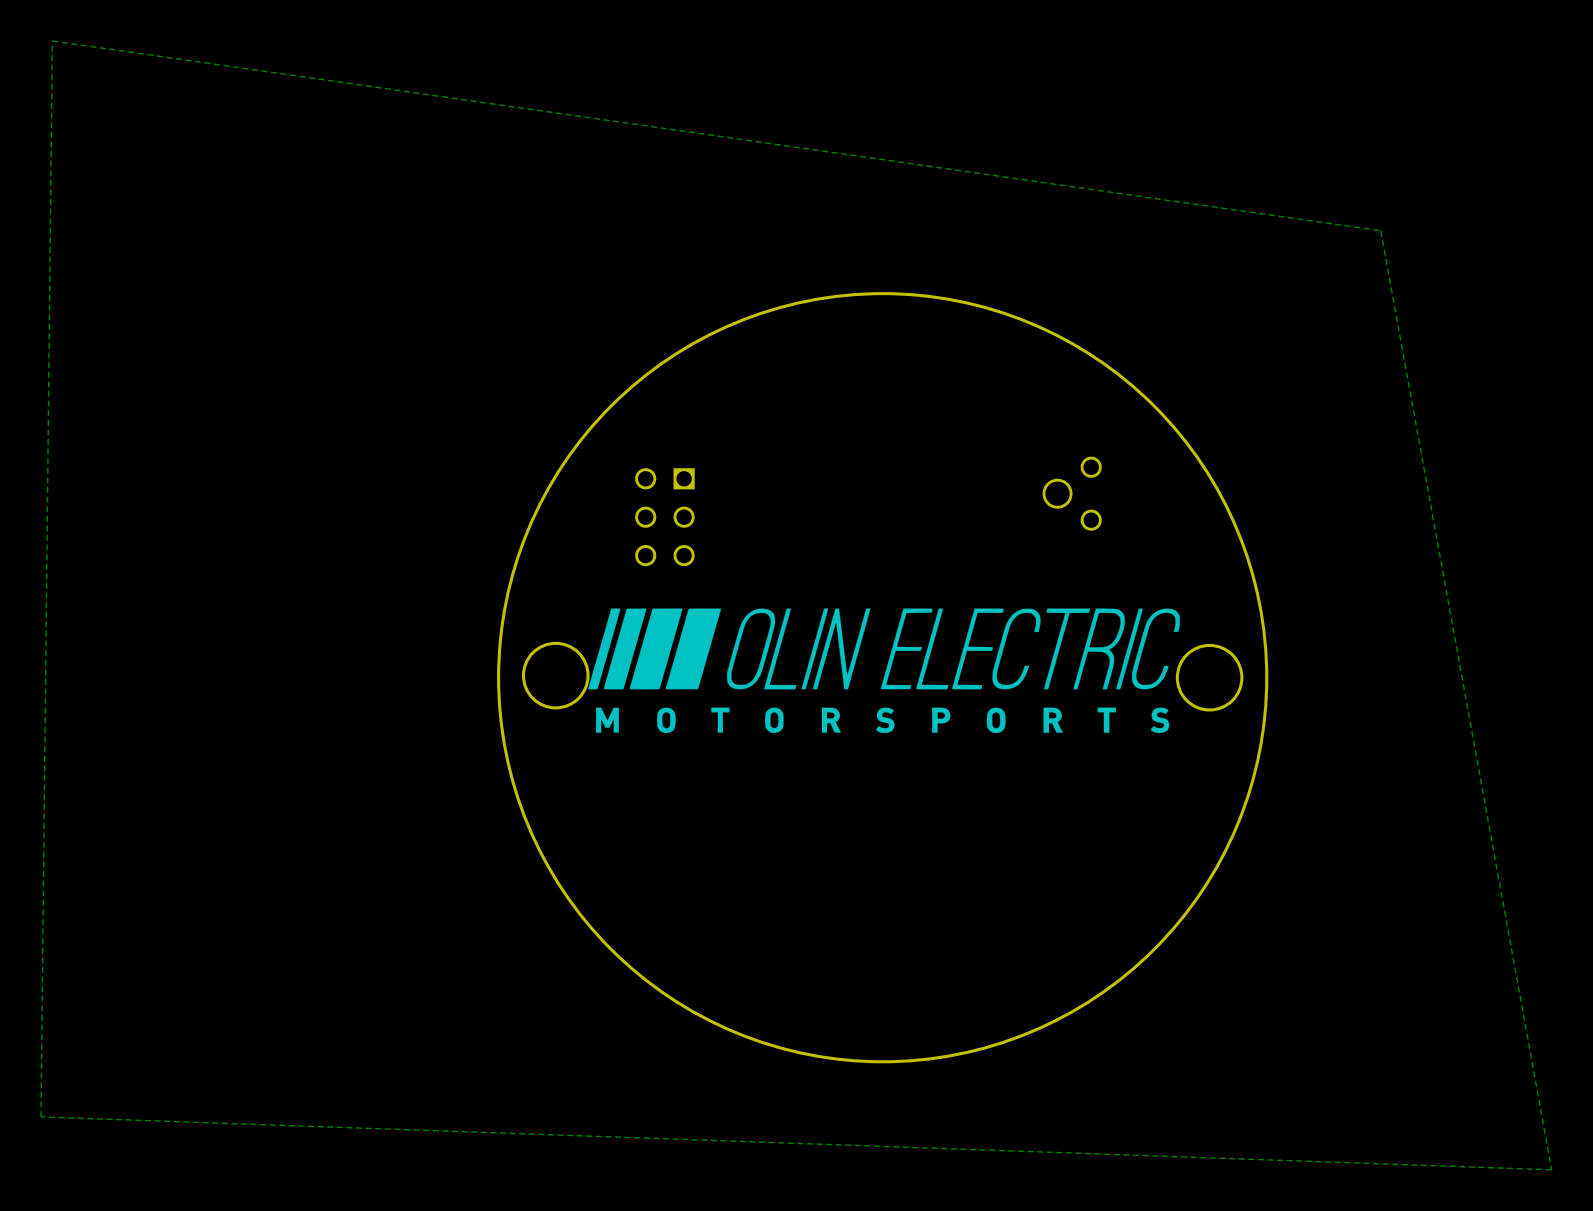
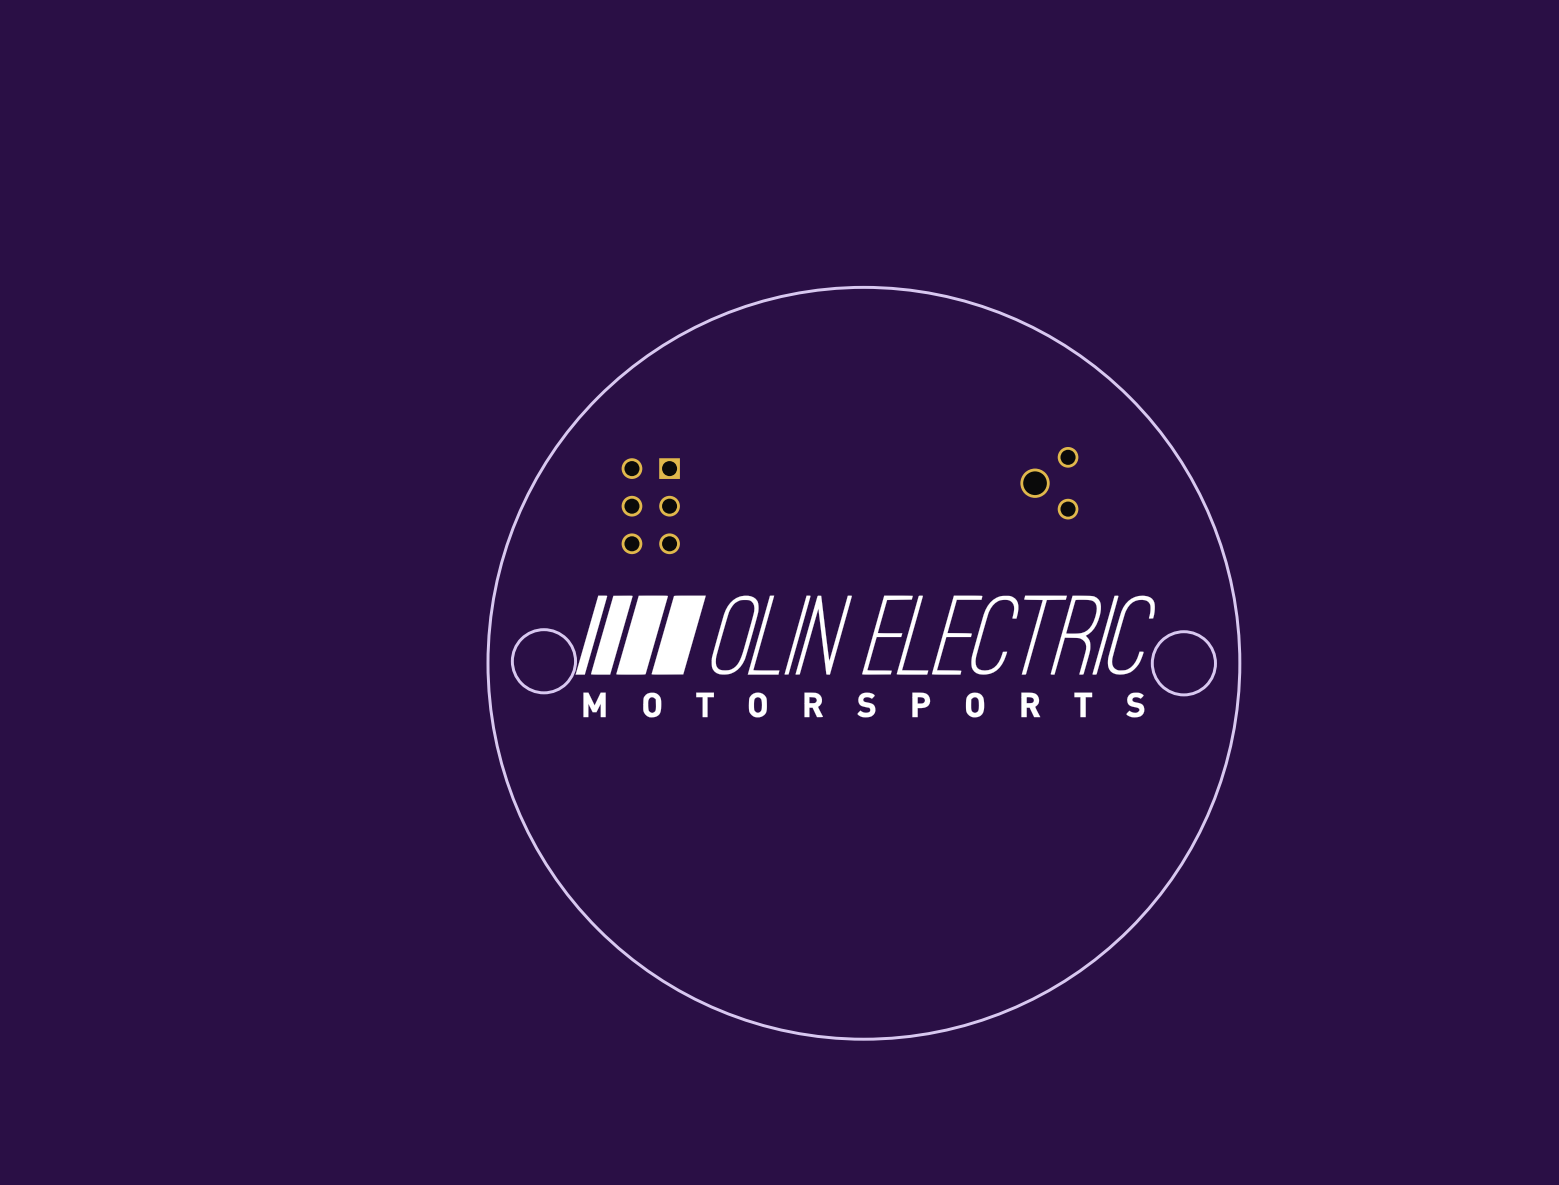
zone outline: (52, 41) (41, 1116) (1551, 1169) (1380, 230) (52, 41) -> none

